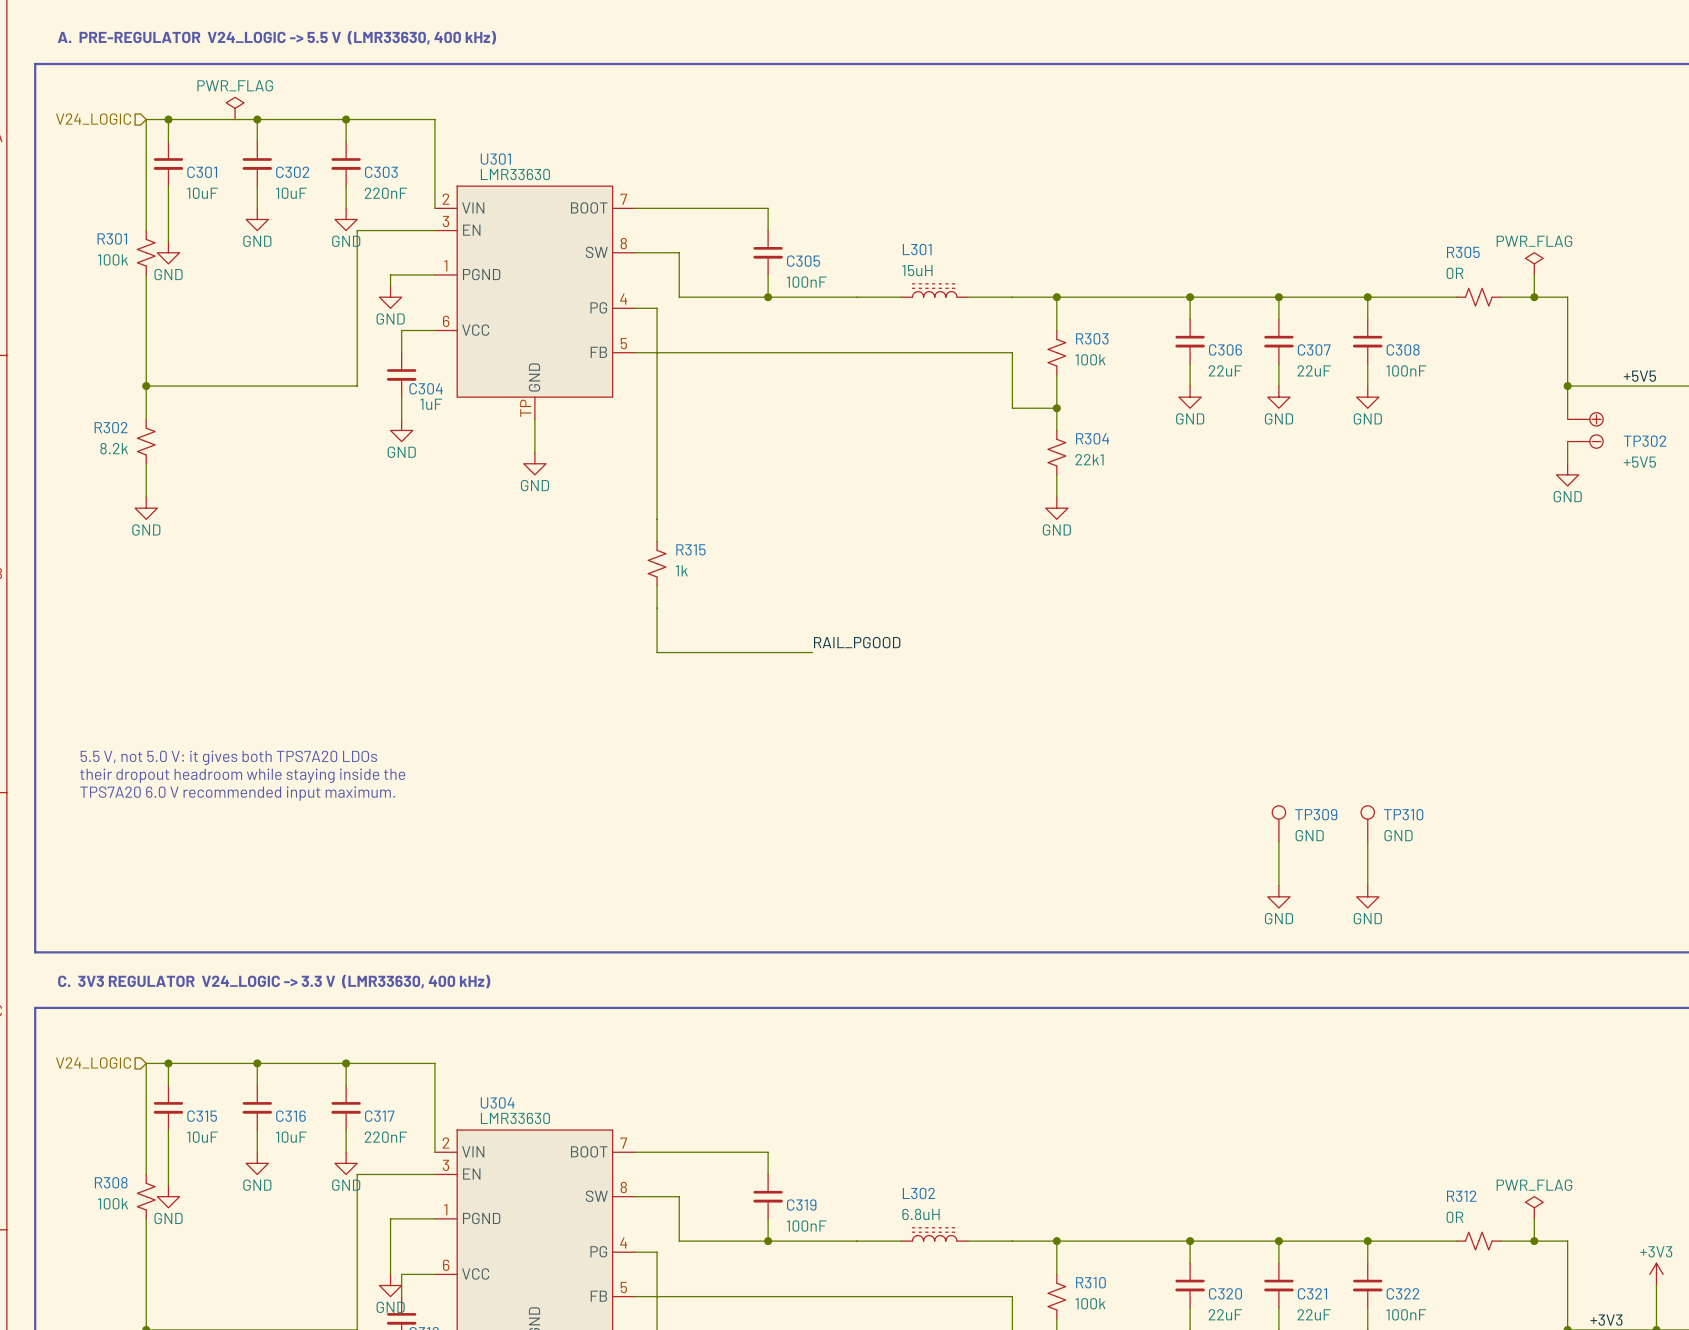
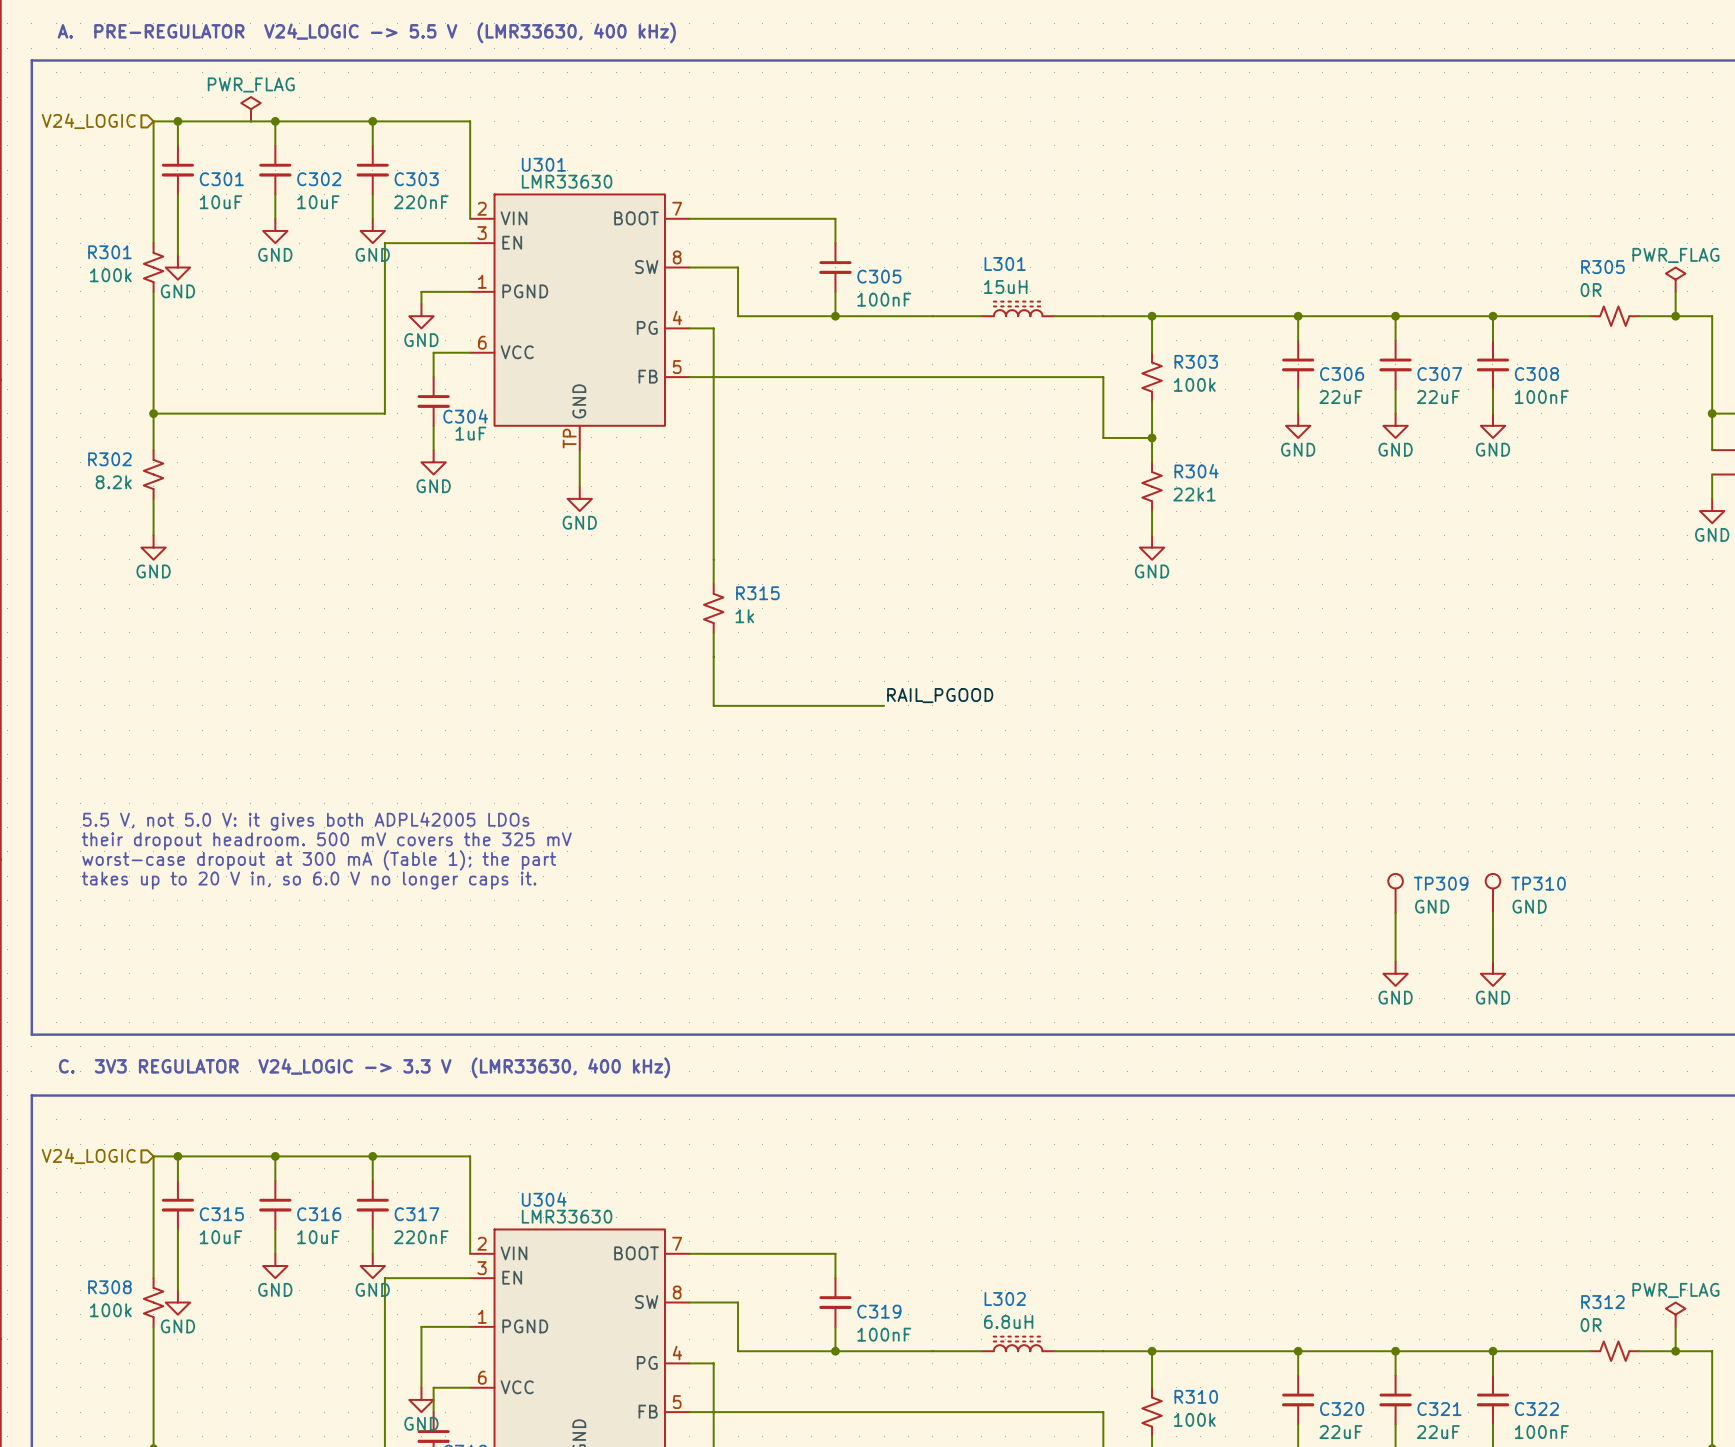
text: 5.5 V, not 5.0 V: it gives both TPS7A20 LDOs (228, 757) -> 5.5 V, not 5.0 V: it gives both ADPL42005 LDOs (306, 821)
text: their dropout headroom while staying inside the (242, 775) -> their dropout headroom. 500 mV covers the 325 mV (326, 841)
text: TPS7A20 6.0 V recommended input maximum. (237, 793) -> worst-case dropout at 300 mA (Table 1); the part (319, 860)
text: none -> takes up to 20 V in, so 6.0 V no longer caps it. (309, 880)

